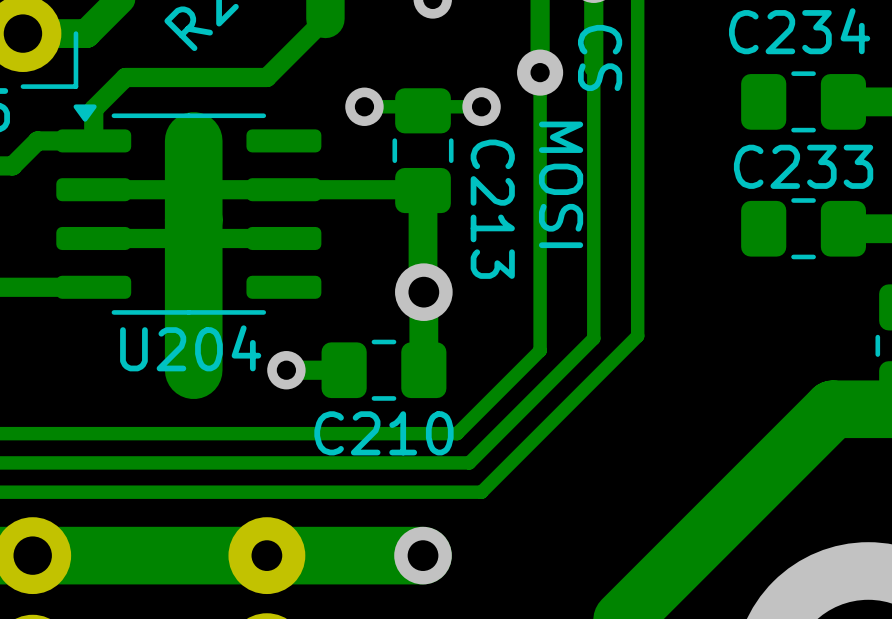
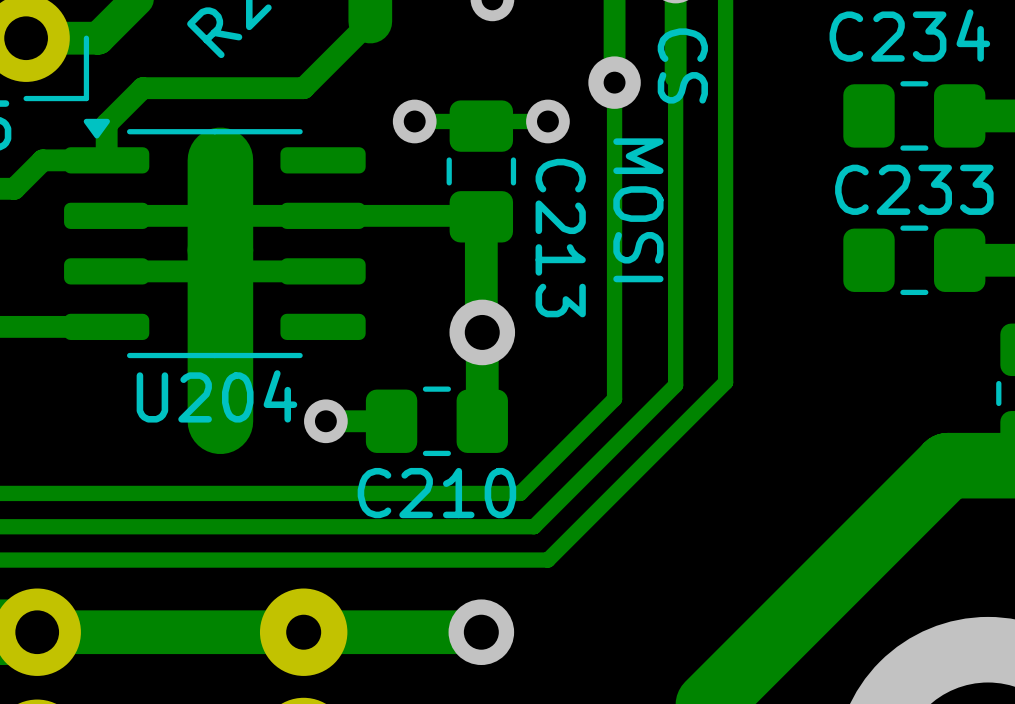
track width: thick (423, 555) (39, 555) -> thin (481, 632) (44, 632)

